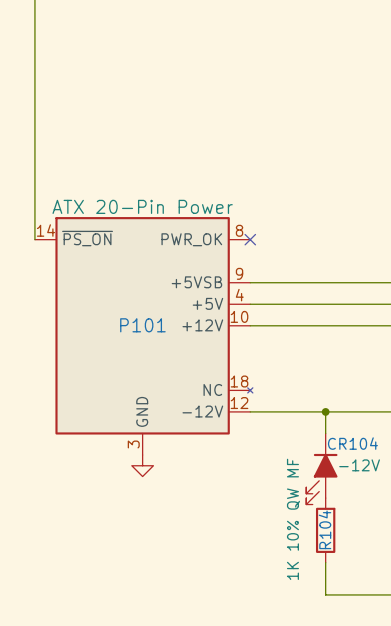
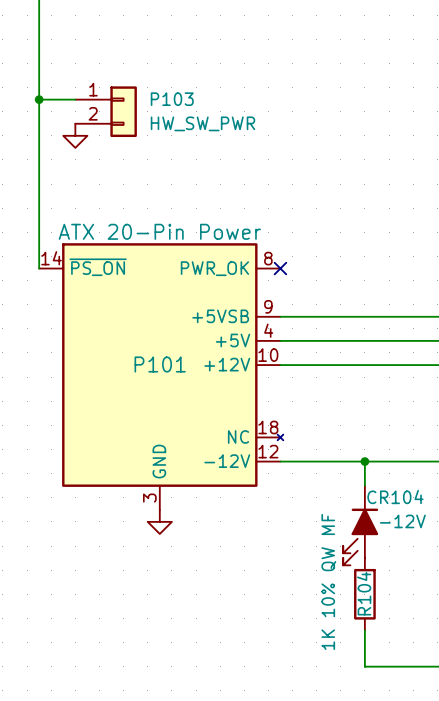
wire: none -> (39, 99) (75, 99)
junction: none -> (39, 99)
P103: none -> HW_SW_PWR (106, 111)
power symbol: none -> (75, 135)

